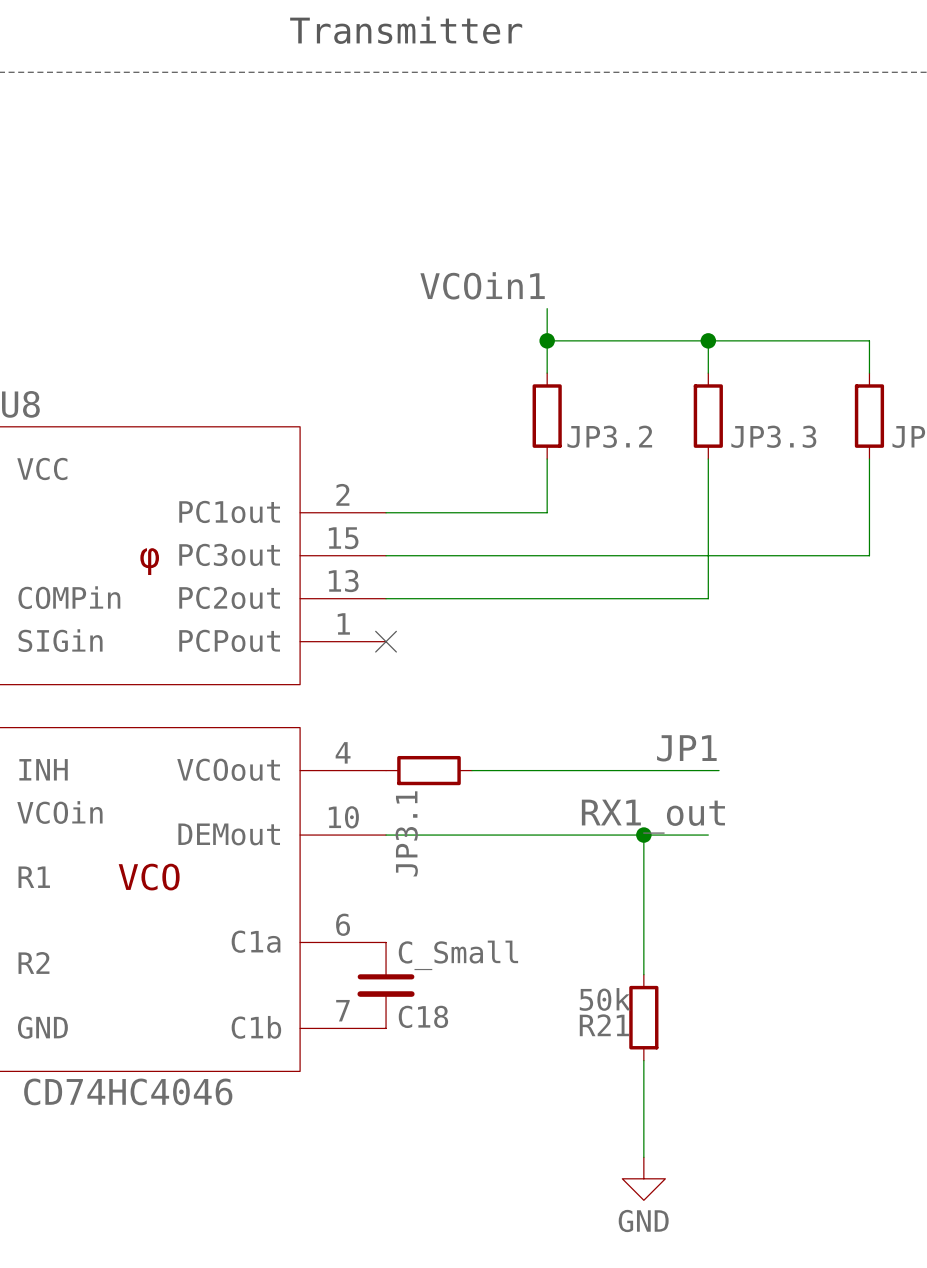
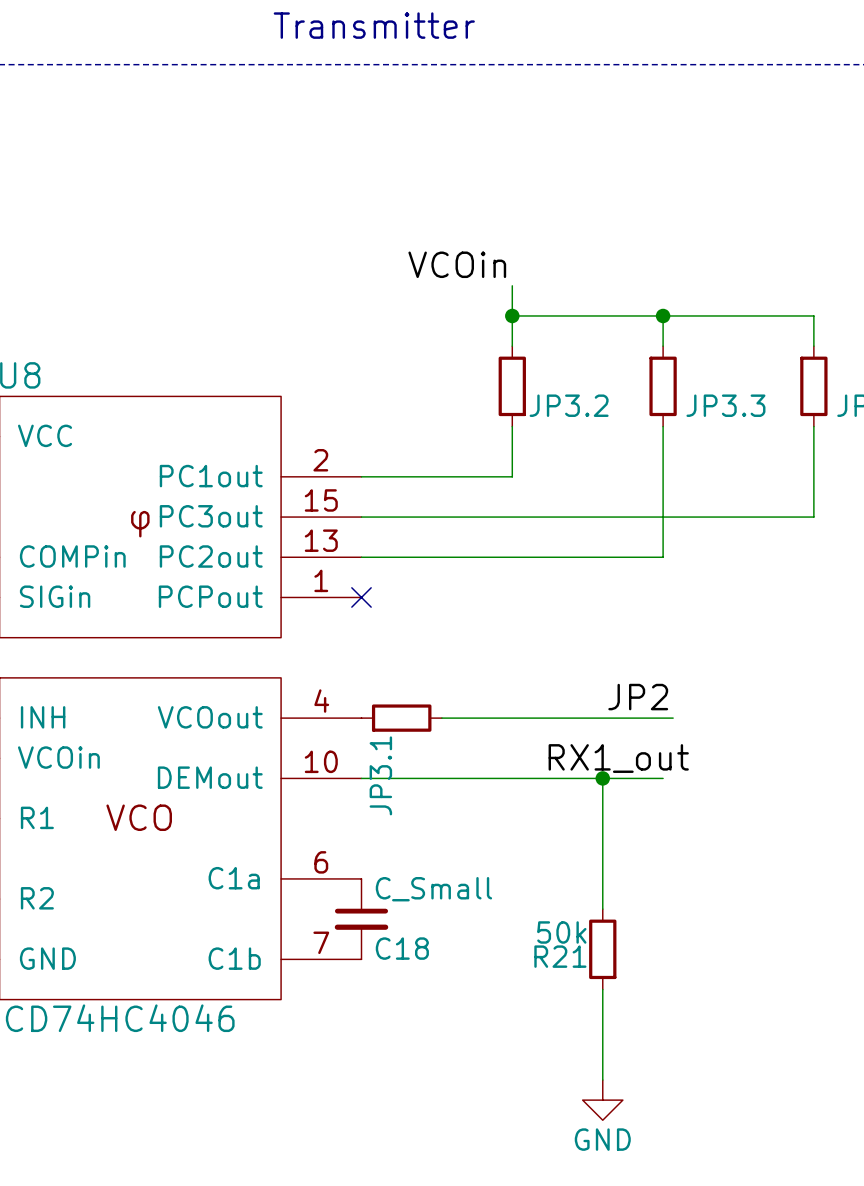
label: VCOin1 (482, 285) -> VCOin (457, 264)
label: JP1 (686, 748) -> JP2 (638, 697)

